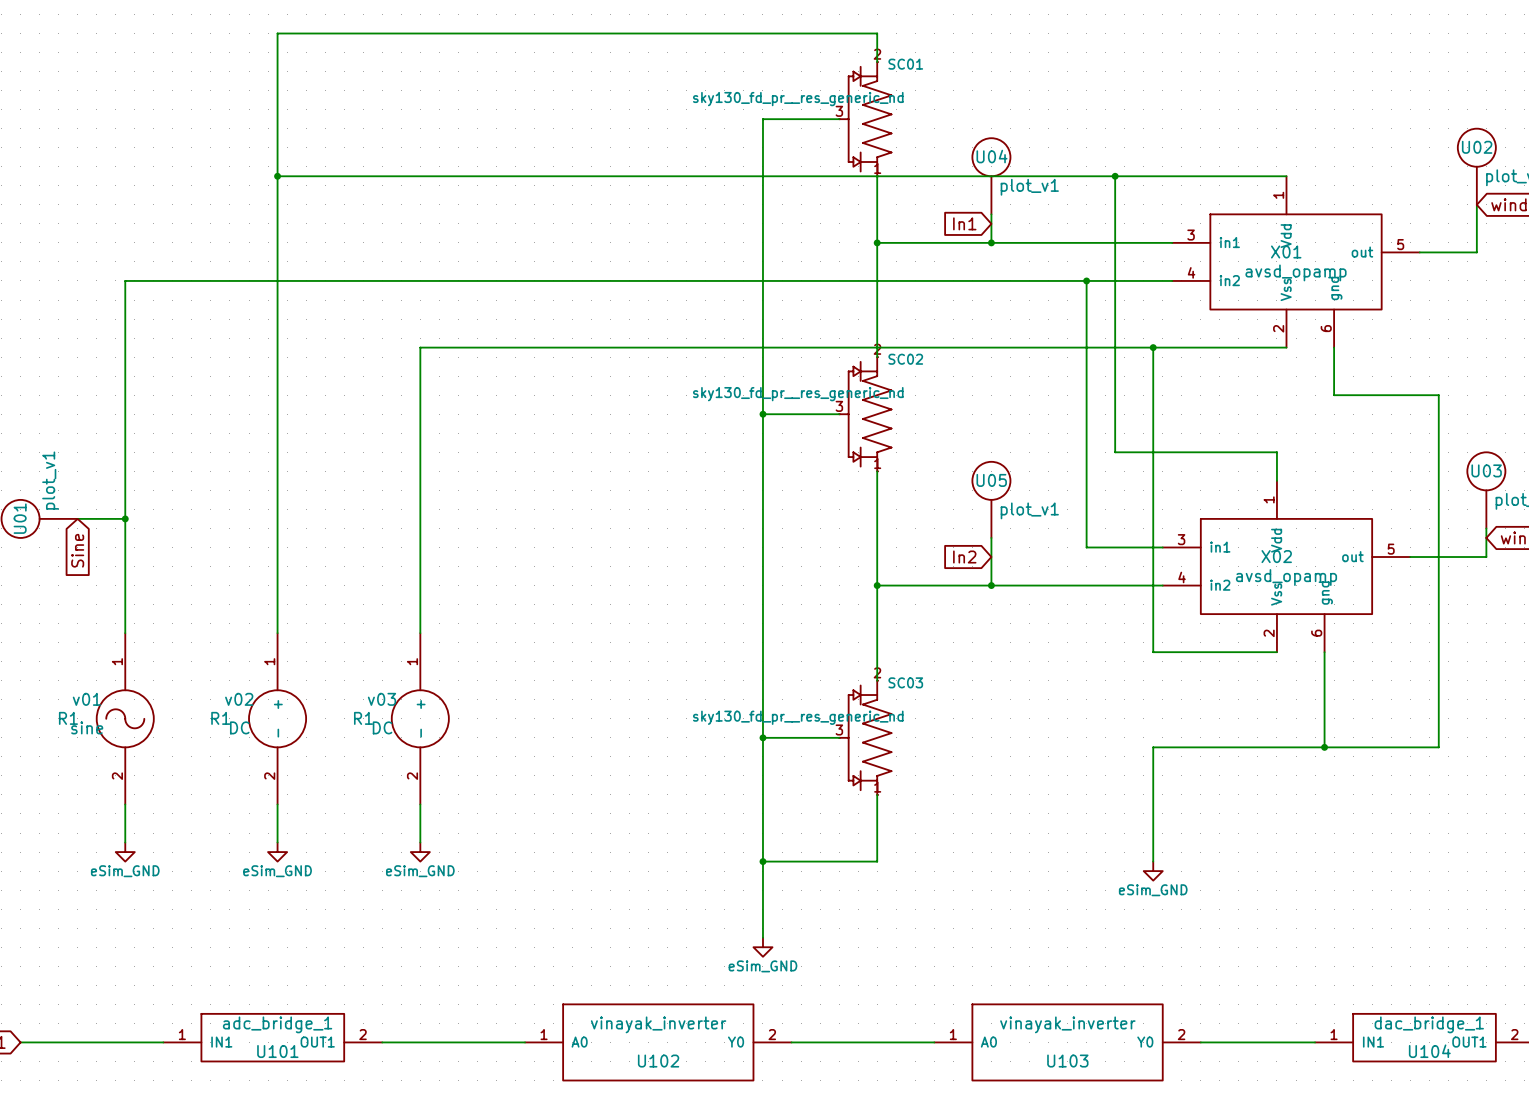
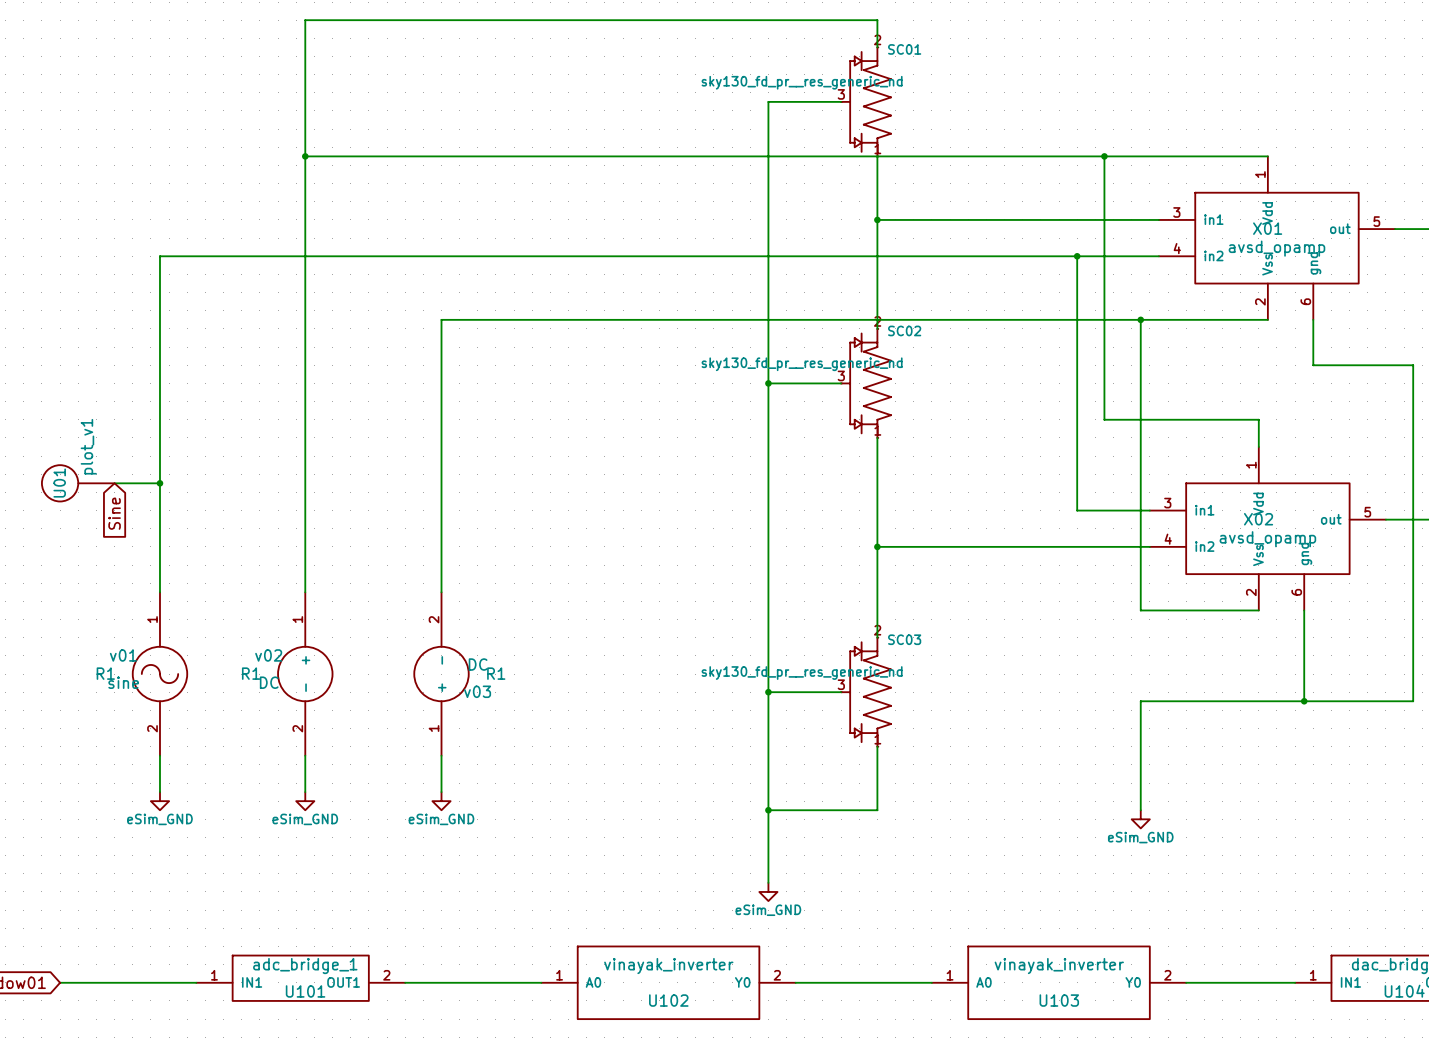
U04: plot_v1 (991, 176) -> none
wire: (991, 214) (991, 242) -> none
global label: In1 (964, 223) -> none
junction: (991, 242) -> none
U05: plot_v1 (991, 499) -> none
wire: (991, 537) (991, 585) -> none
global label: In2 (964, 557) -> none
junction: (991, 585) -> none
v03 rotation: 0° (420, 718) -> 180° (441, 674)

